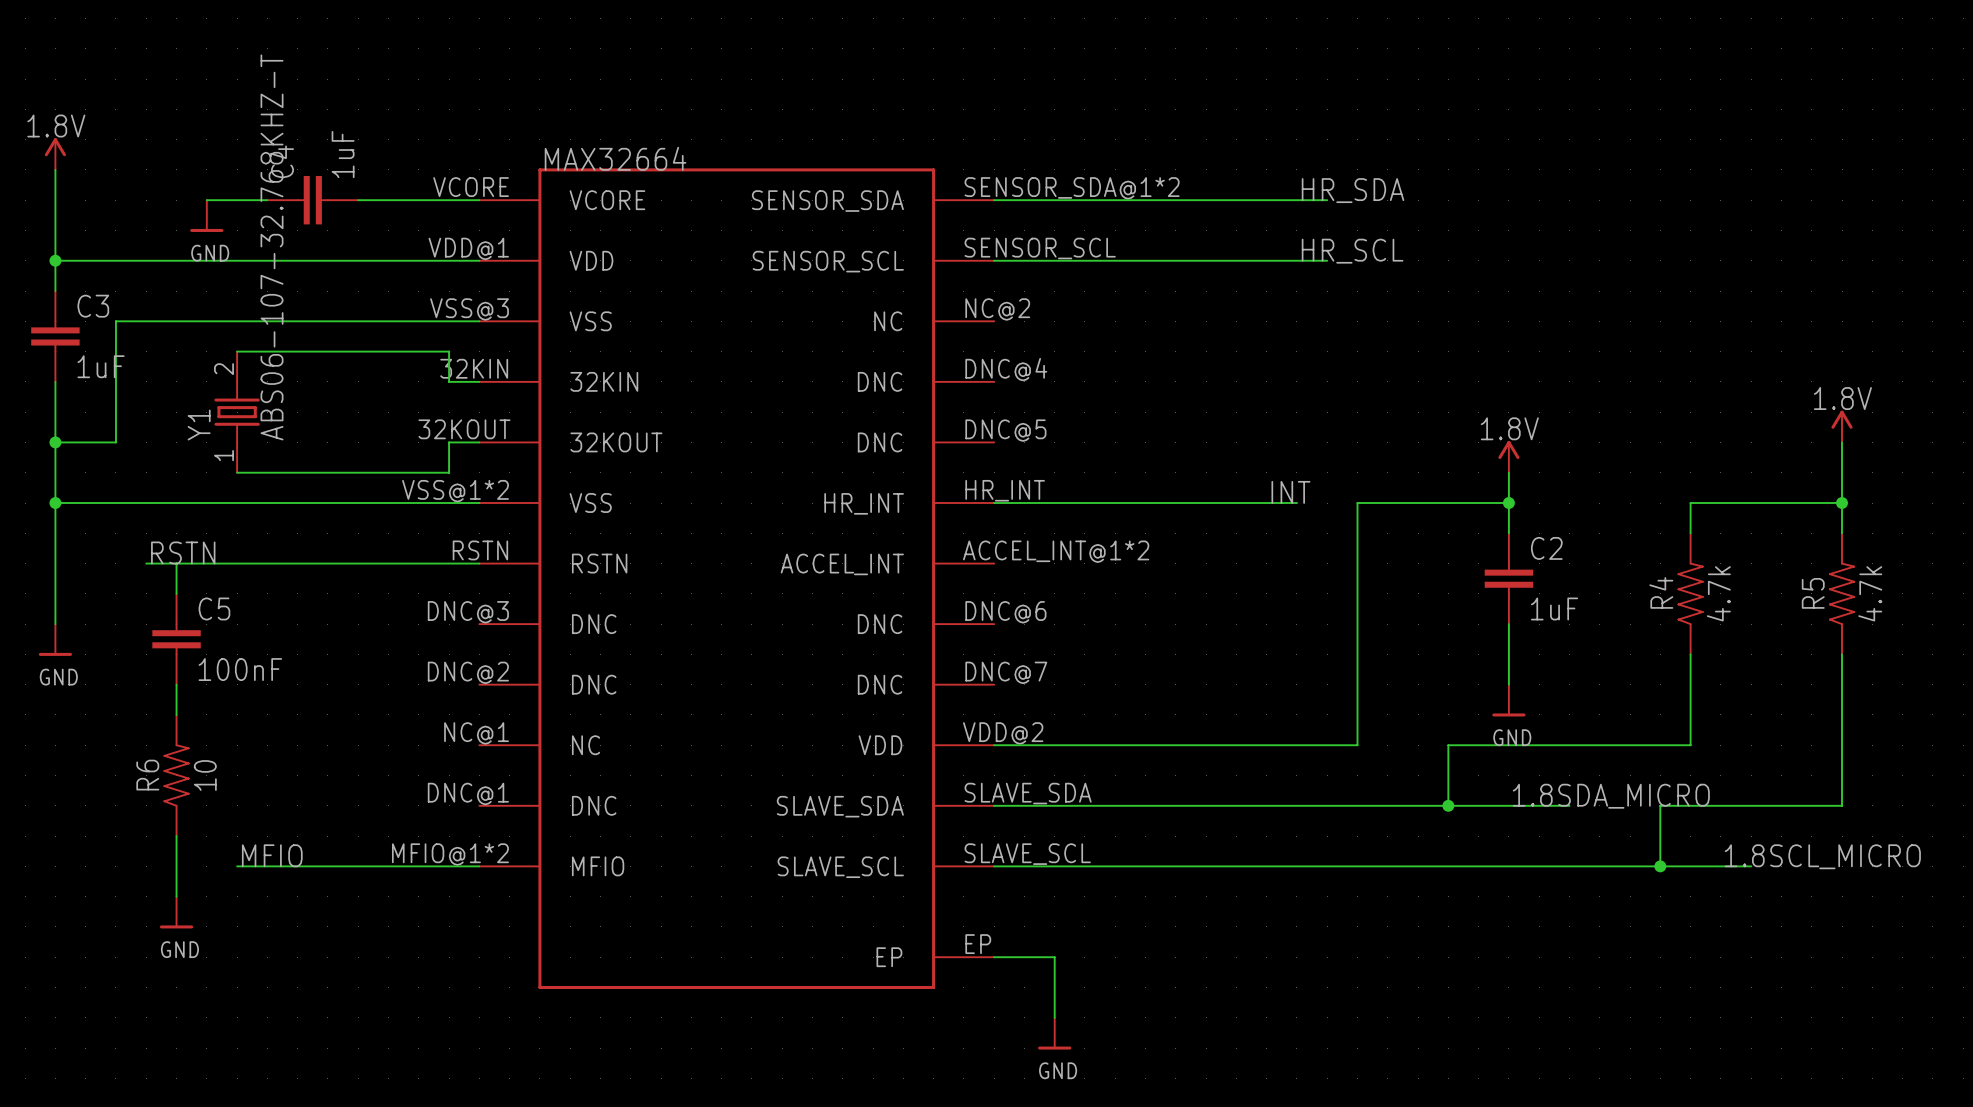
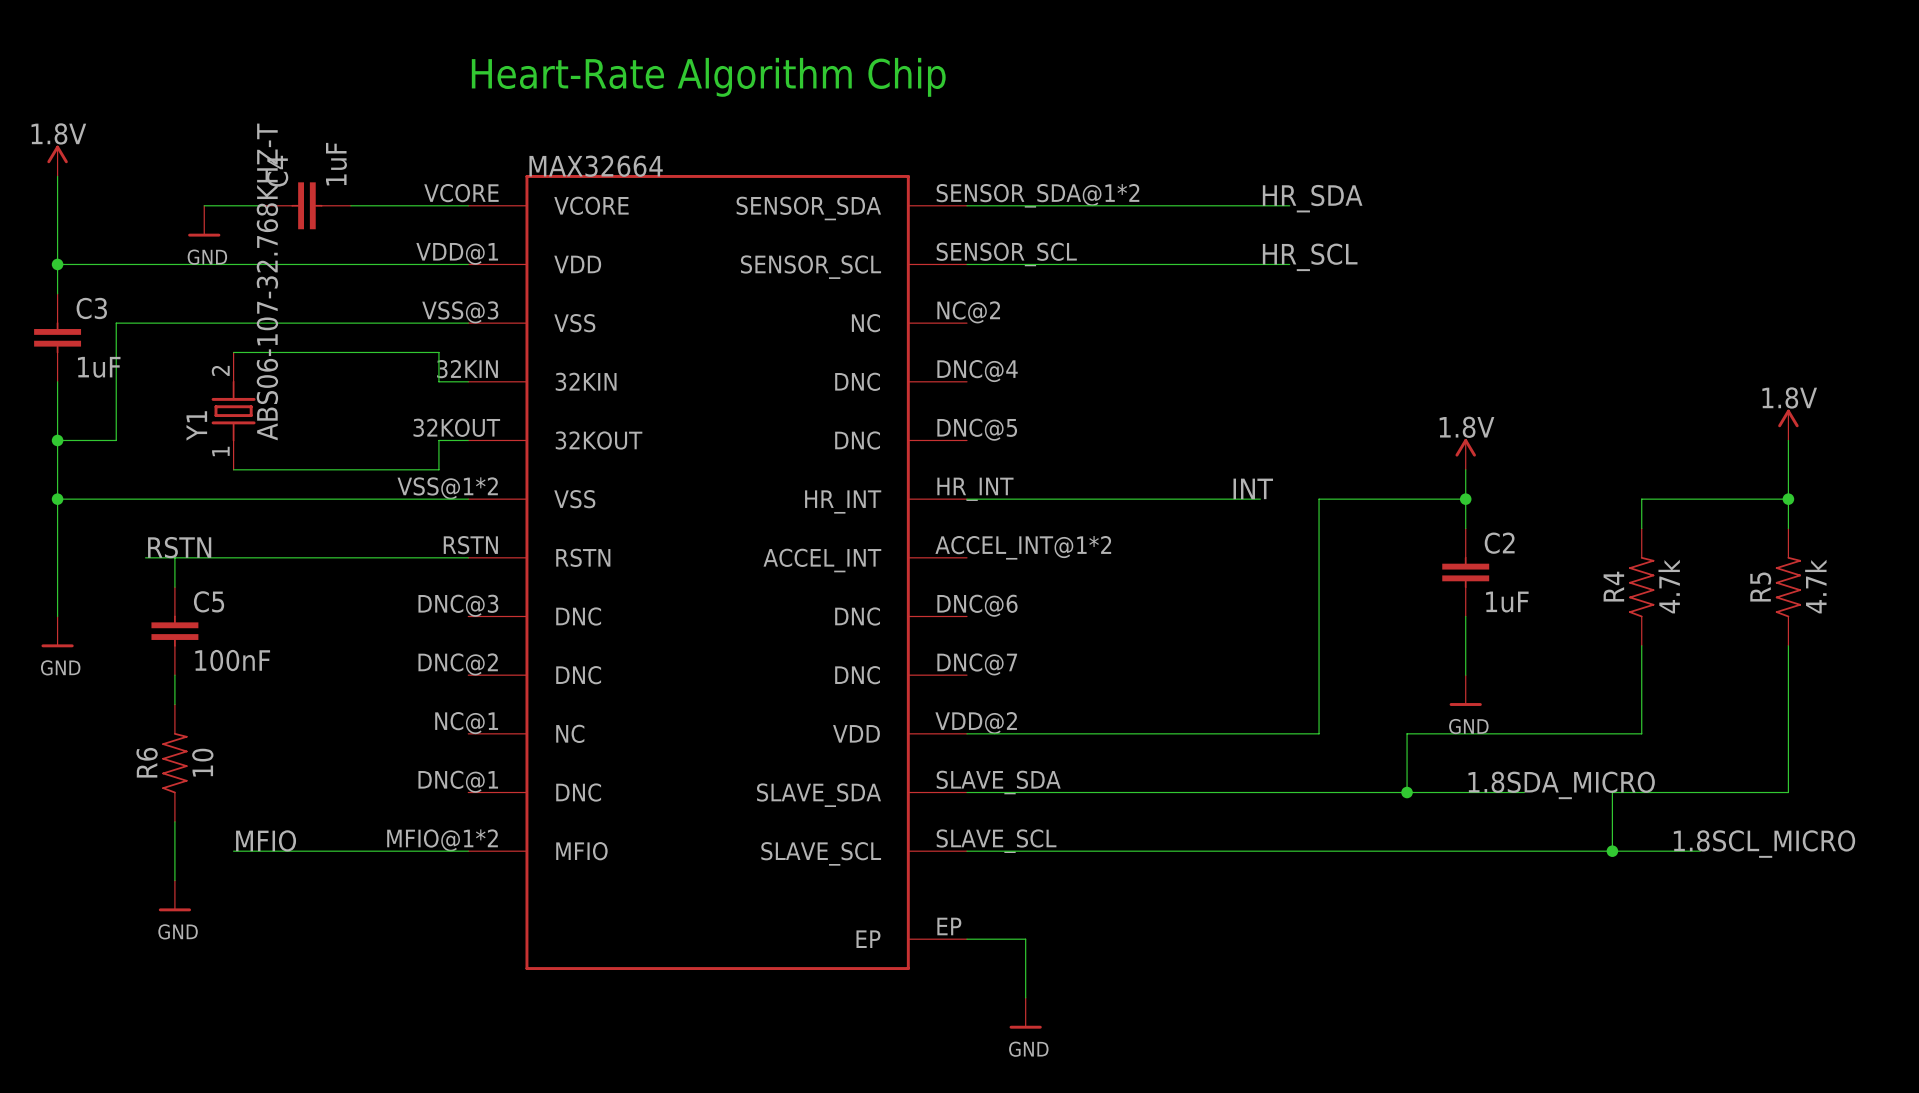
text: none -> Heart-Rate Algorithm Chip (708, 77)

